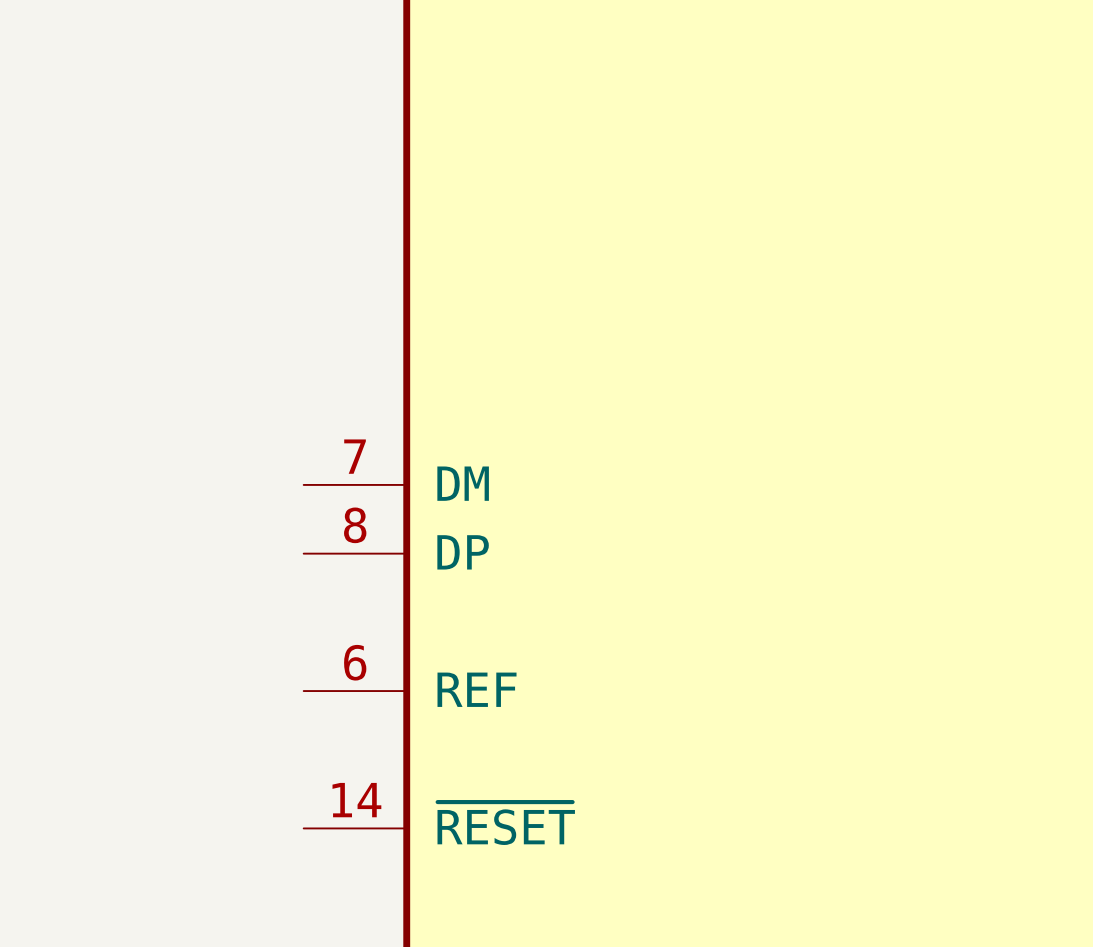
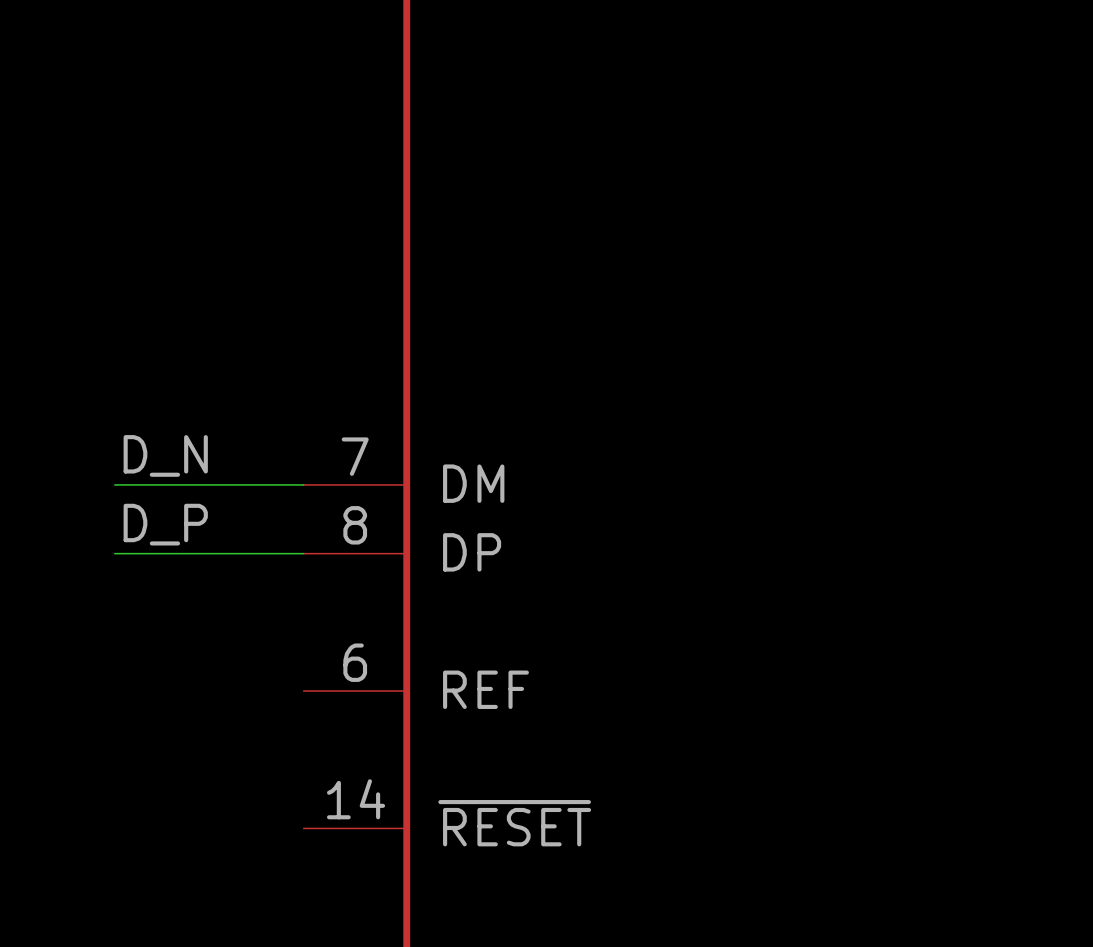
label: none -> D_N (165, 455)
wire: none -> (114, 484) (303, 484)
label: none -> D_P (165, 524)
wire: none -> (114, 553) (303, 553)

